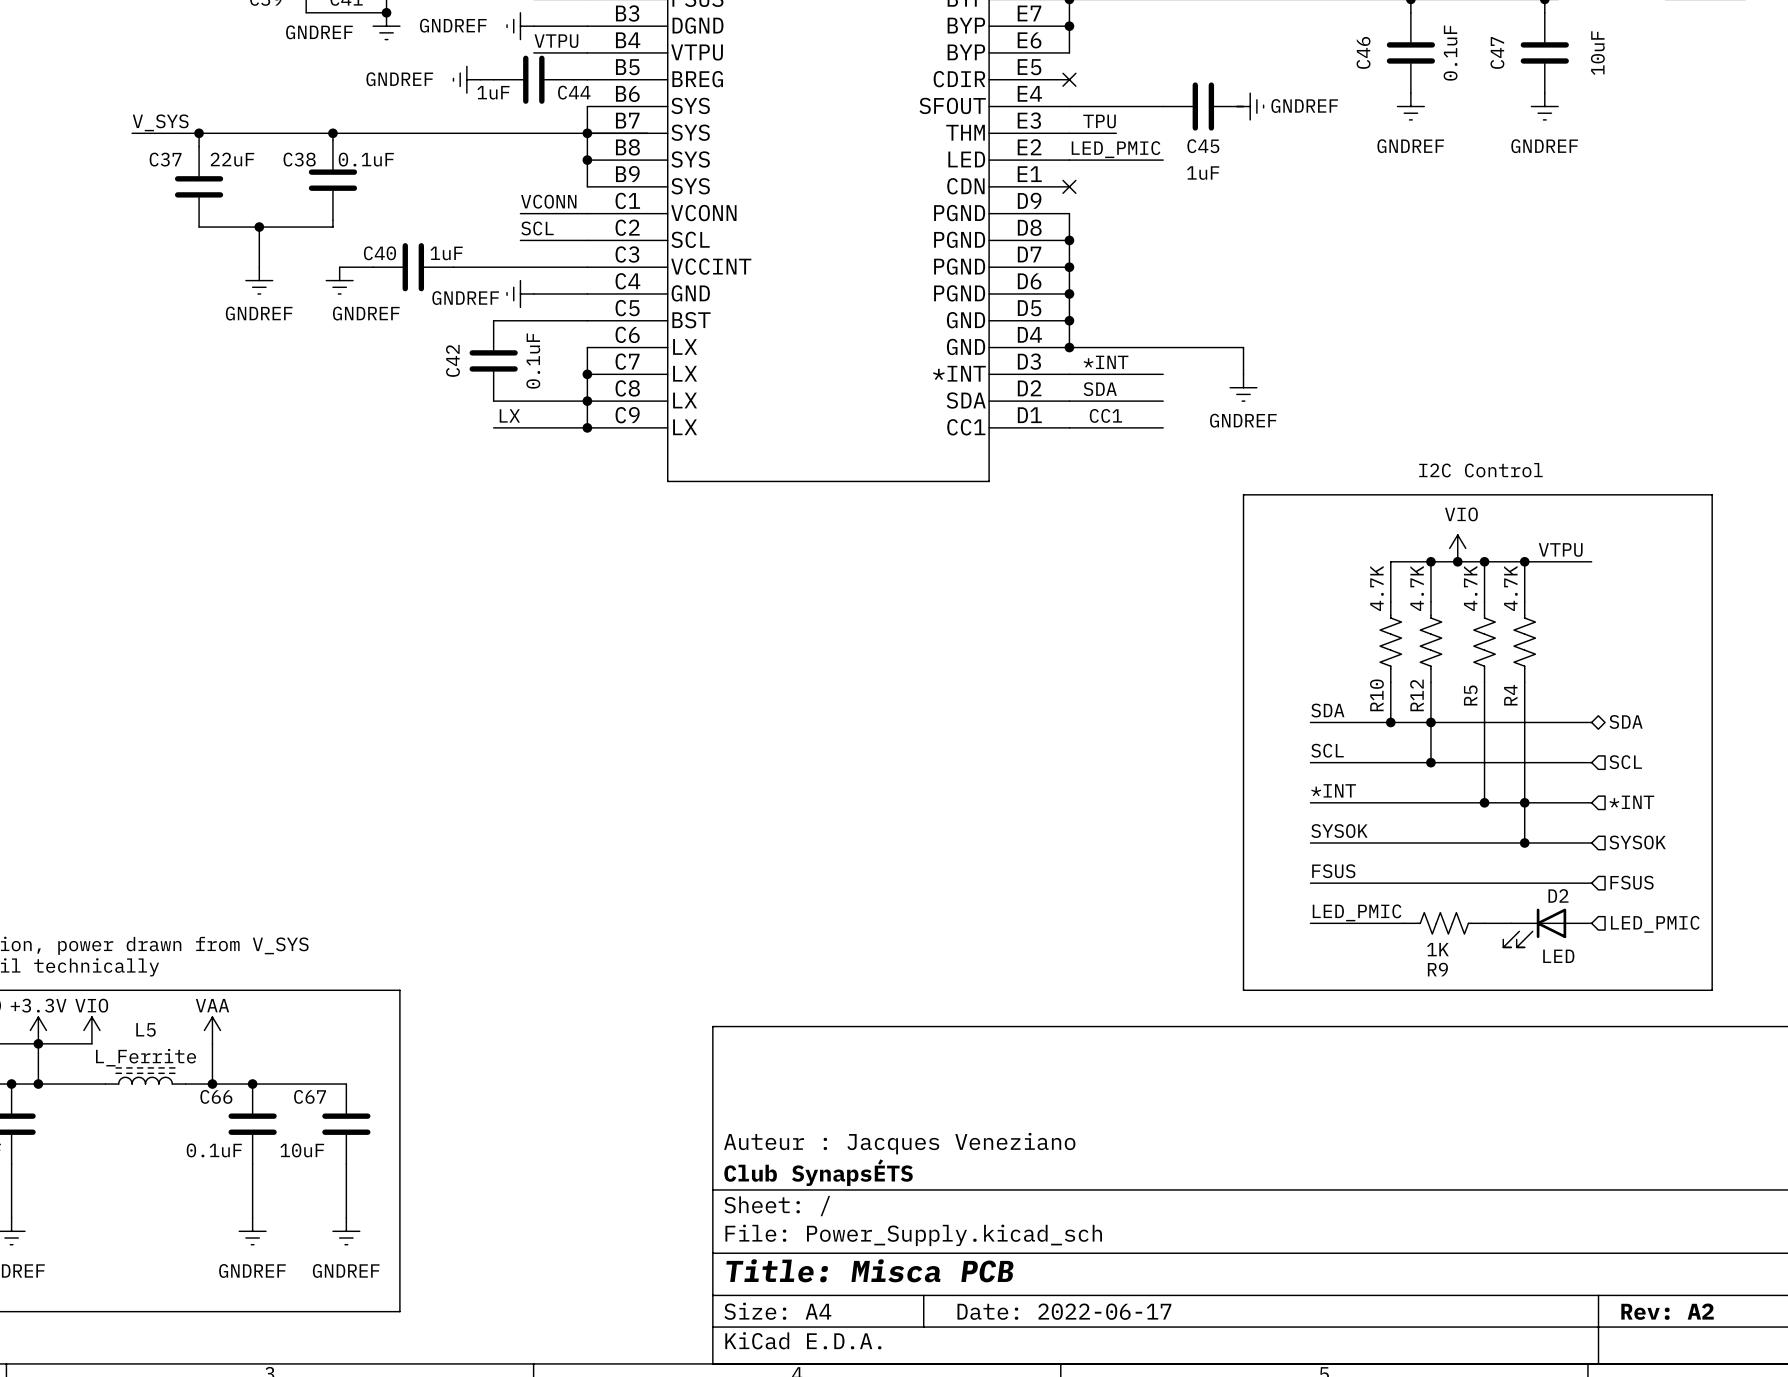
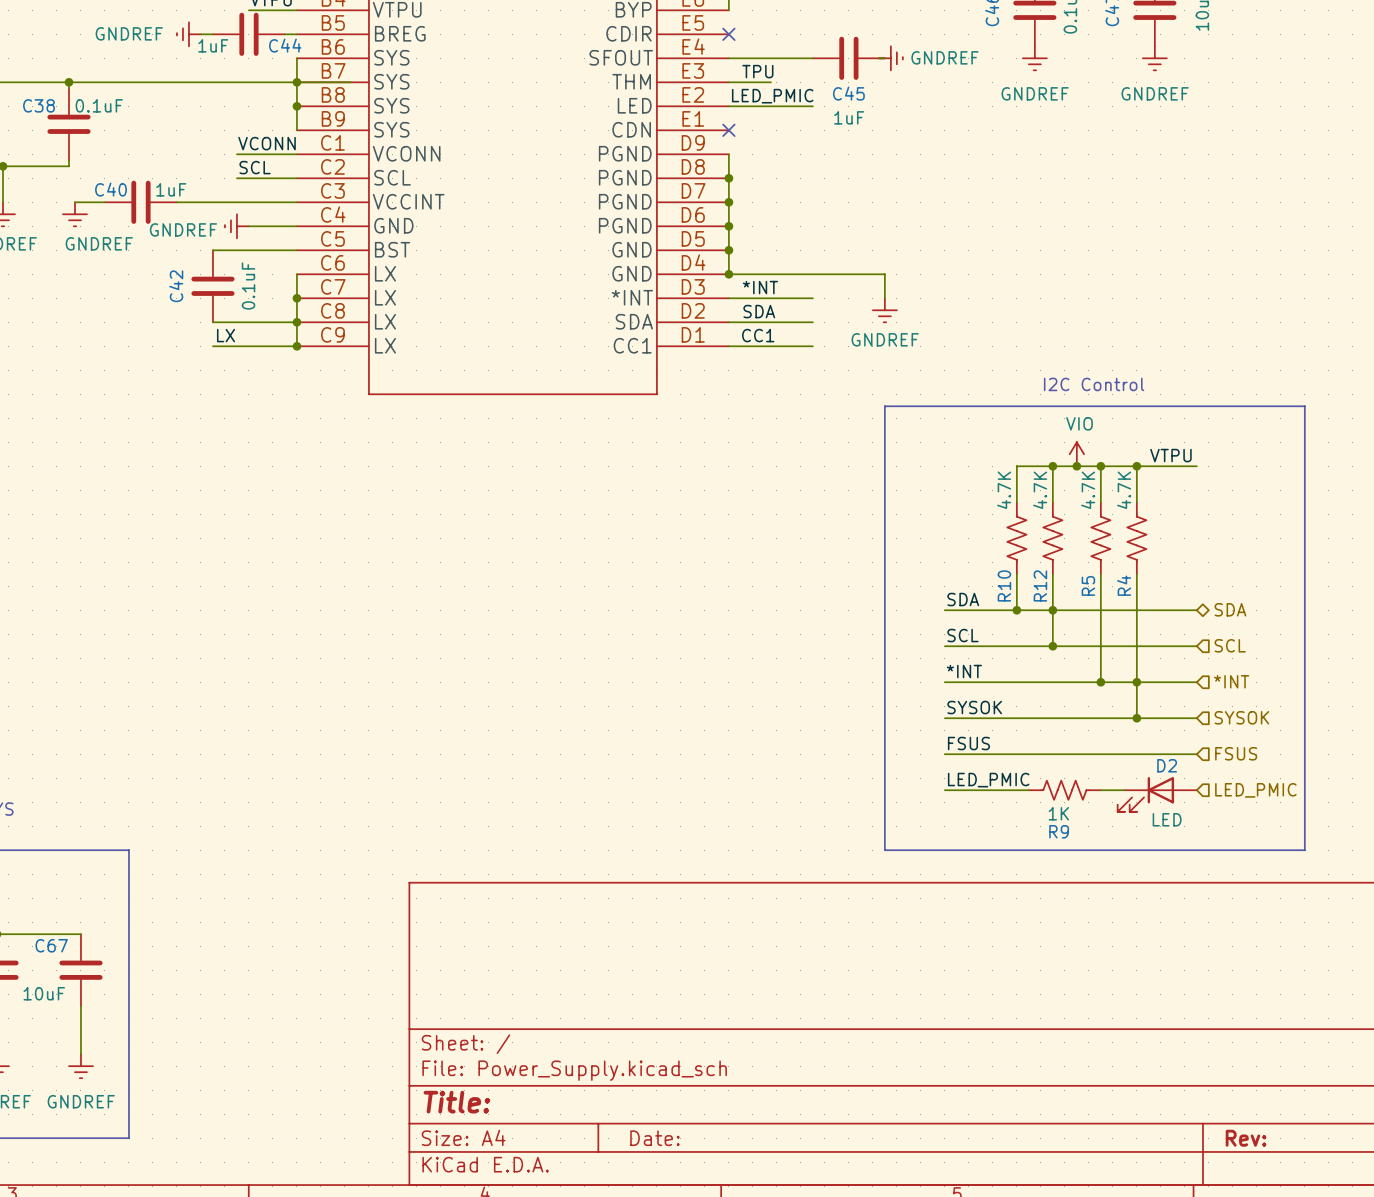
title block: Auteur : Jacques Veneziano (899, 1143) -> none
title block: Club SynapsÉTS (818, 1172) -> none
title block: Title: Misca PCB (869, 1270) -> Title: (456, 1102)
title block: Date: 2022-06-17 (1064, 1311) -> Date: (654, 1138)
title block: Rev: A2 (1667, 1311) -> Rev: (1246, 1138)

